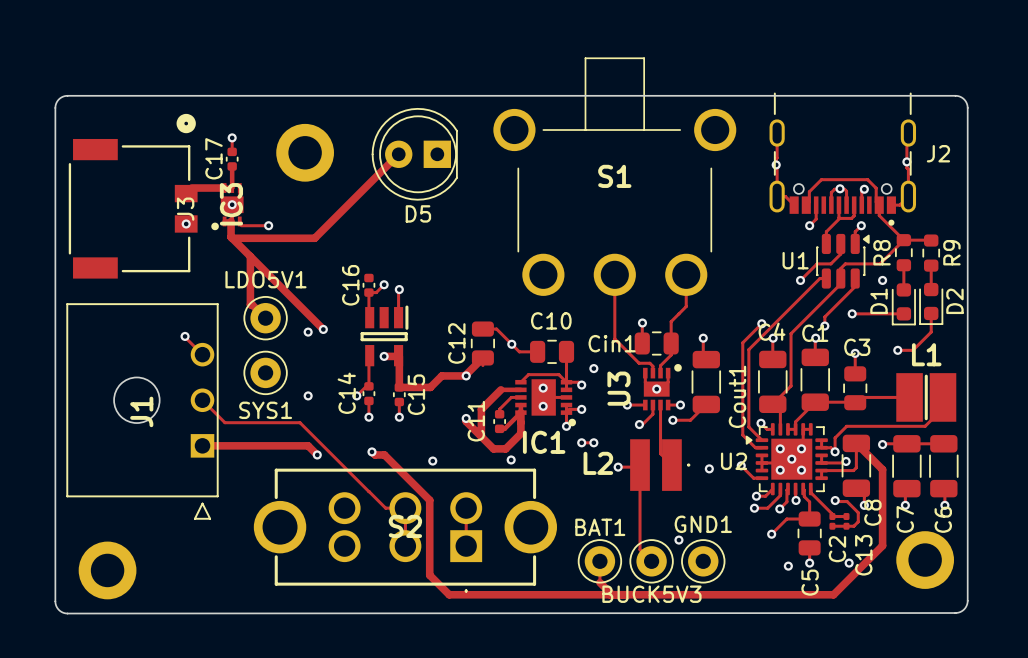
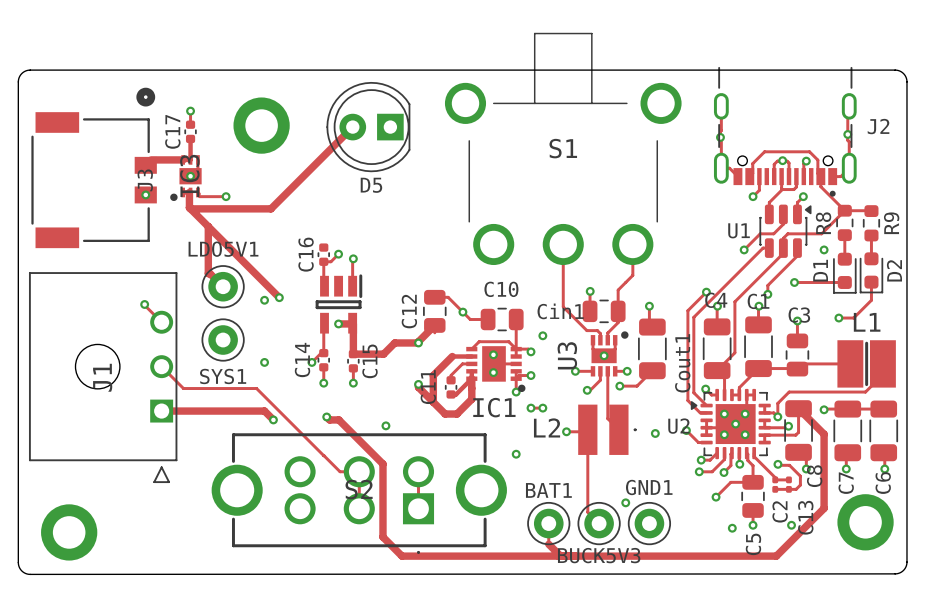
via position: (511, 459) -> (516, 454)

